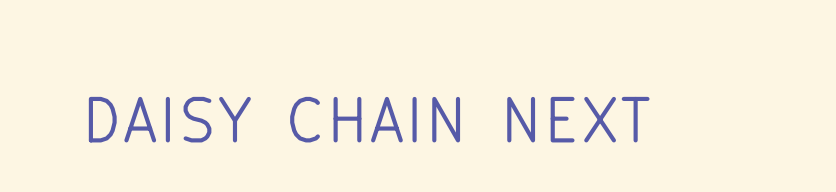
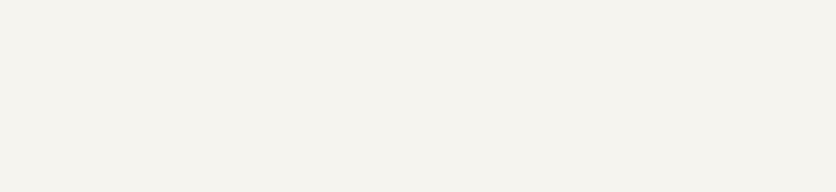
text: DAISY CHAIN NEXT (369, 119) -> none

